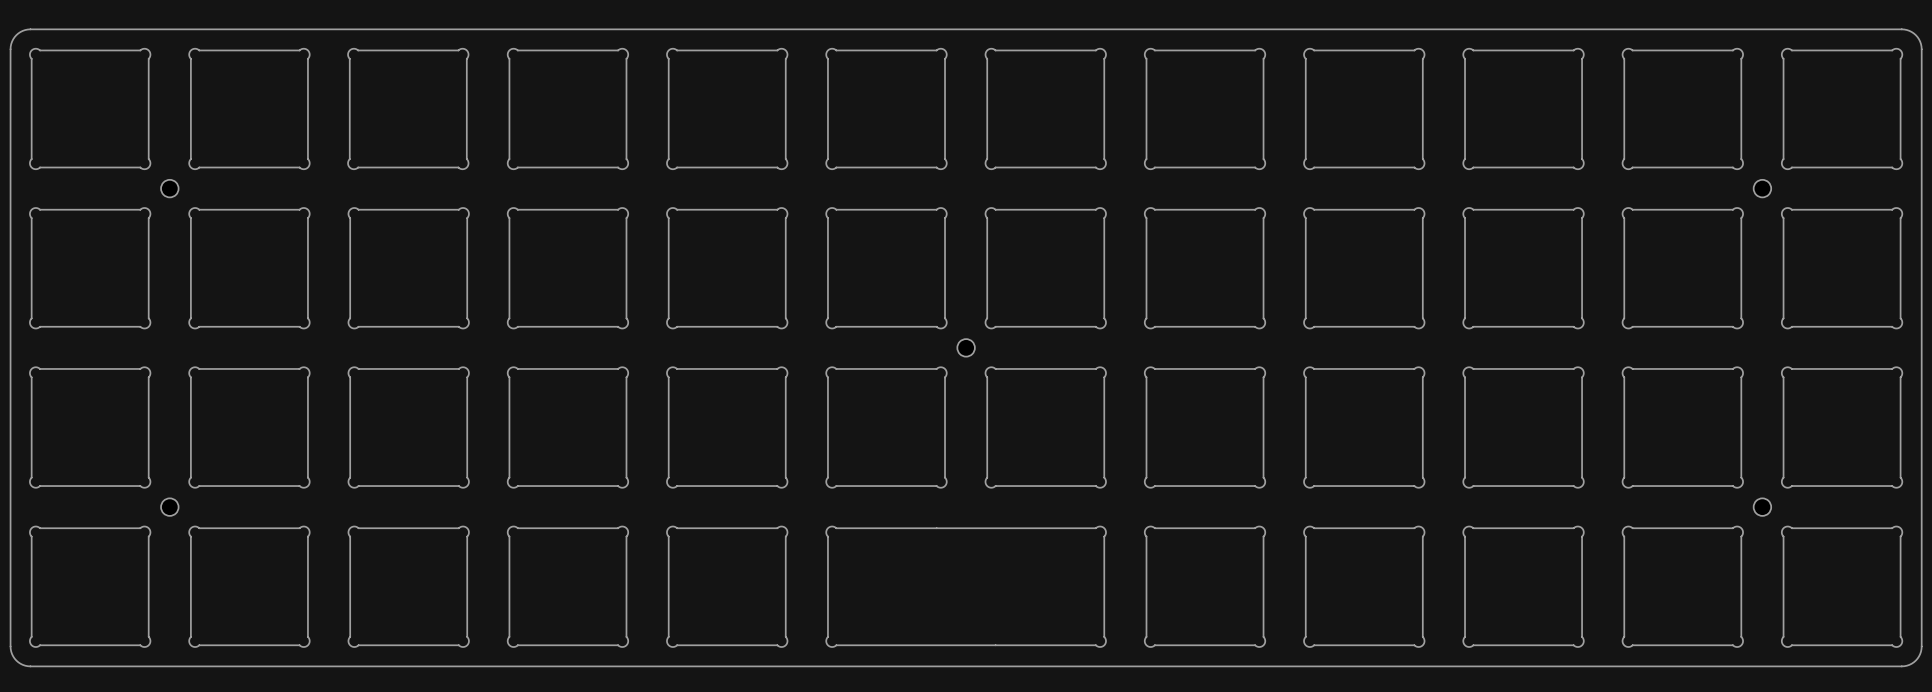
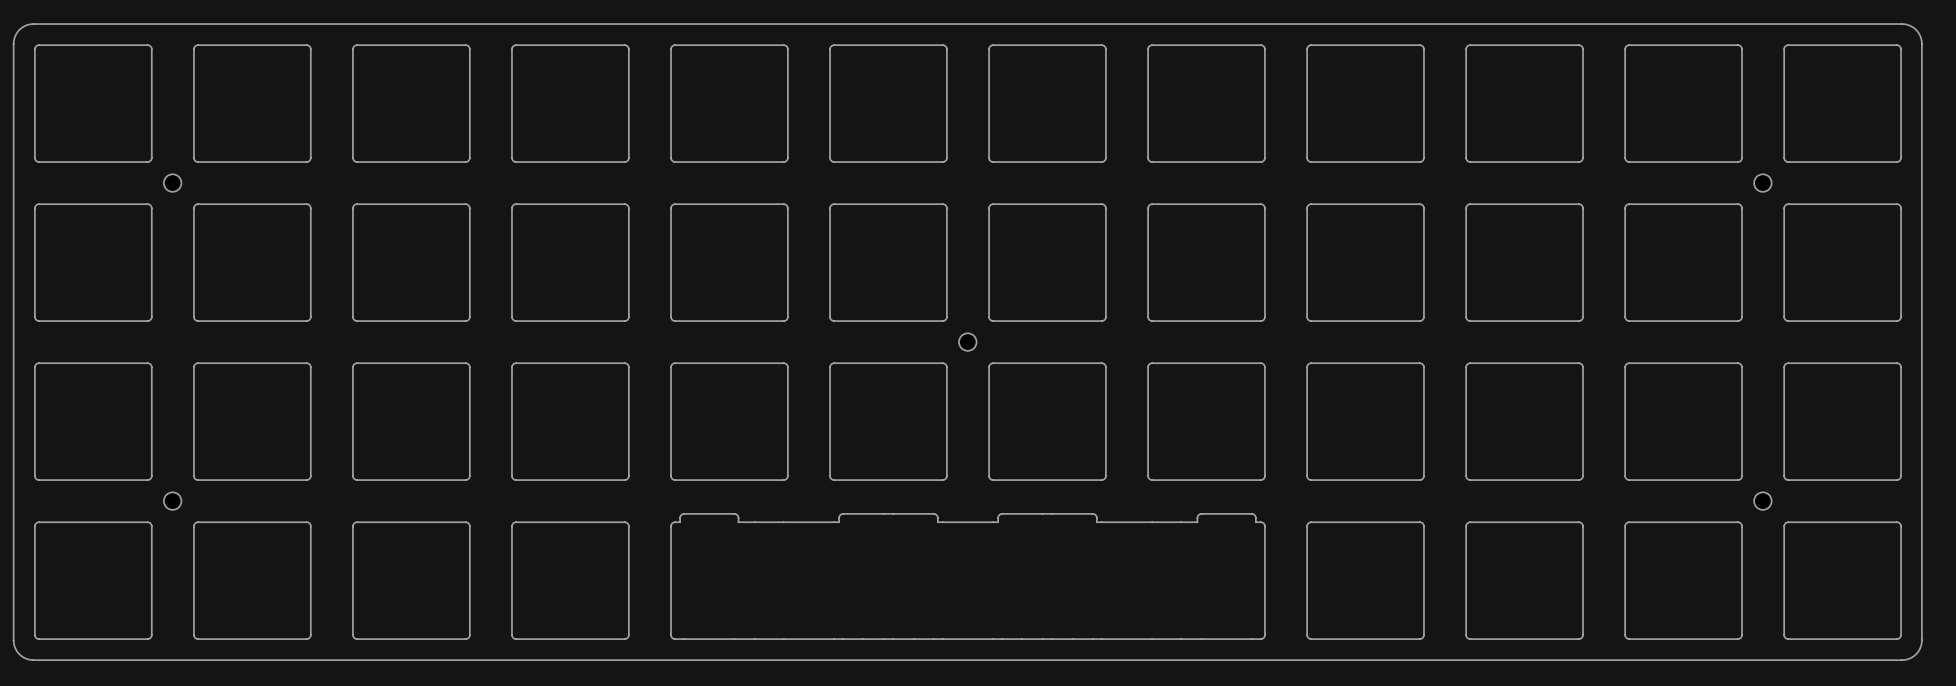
drawing: [29, 48, 151, 170] -> none
drawing: [188, 48, 311, 170] -> none
drawing: [347, 48, 469, 170] -> none
drawing: [507, 48, 629, 170] -> none
drawing: [666, 48, 788, 170] -> none
drawing: [825, 48, 948, 170] -> none
drawing: [985, 48, 1107, 170] -> none
drawing: [1144, 48, 1266, 170] -> none
drawing: [1303, 48, 1425, 170] -> none
drawing: [1462, 48, 1585, 170] -> none
drawing: [1622, 48, 1744, 170] -> none
drawing: [1781, 48, 1903, 170] -> none
drawing: none -> [34, 44, 1902, 640]
drawing: [29, 207, 151, 329] -> none
drawing: [188, 207, 311, 329] -> none
drawing: [348, 207, 470, 329] -> none
drawing: [507, 207, 629, 329] -> none
drawing: [666, 207, 788, 329] -> none
drawing: [825, 207, 948, 329] -> none
drawing: [985, 207, 1107, 329] -> none
drawing: [1144, 207, 1266, 329] -> none
drawing: [1303, 207, 1425, 329] -> none
drawing: [1462, 207, 1585, 329] -> none
drawing: [1622, 207, 1744, 329] -> none
drawing: [1781, 207, 1903, 329] -> none
drawing: [29, 366, 151, 489] -> none
drawing: [188, 366, 311, 489] -> none
drawing: [348, 366, 470, 489] -> none
drawing: [507, 366, 629, 489] -> none
drawing: [666, 366, 788, 489] -> none
drawing: [825, 366, 948, 489] -> none
drawing: [985, 366, 1107, 489] -> none
drawing: [1144, 366, 1266, 489] -> none
drawing: [1303, 366, 1425, 489] -> none
drawing: [1462, 366, 1585, 489] -> none
drawing: [1622, 366, 1744, 489] -> none
drawing: [1781, 366, 1903, 489] -> none
drawing: [29, 526, 151, 648] -> none
drawing: [188, 526, 311, 648] -> none
drawing: [348, 526, 470, 648] -> none
drawing: [507, 526, 629, 648] -> none
drawing: [666, 526, 788, 648] -> none
drawing: [825, 526, 1107, 648] -> none
drawing: [1144, 526, 1266, 648] -> none
drawing: [1303, 526, 1425, 648] -> none
drawing: [1462, 526, 1585, 648] -> none
drawing: [1622, 526, 1744, 648] -> none
drawing: [1781, 526, 1903, 648] -> none

